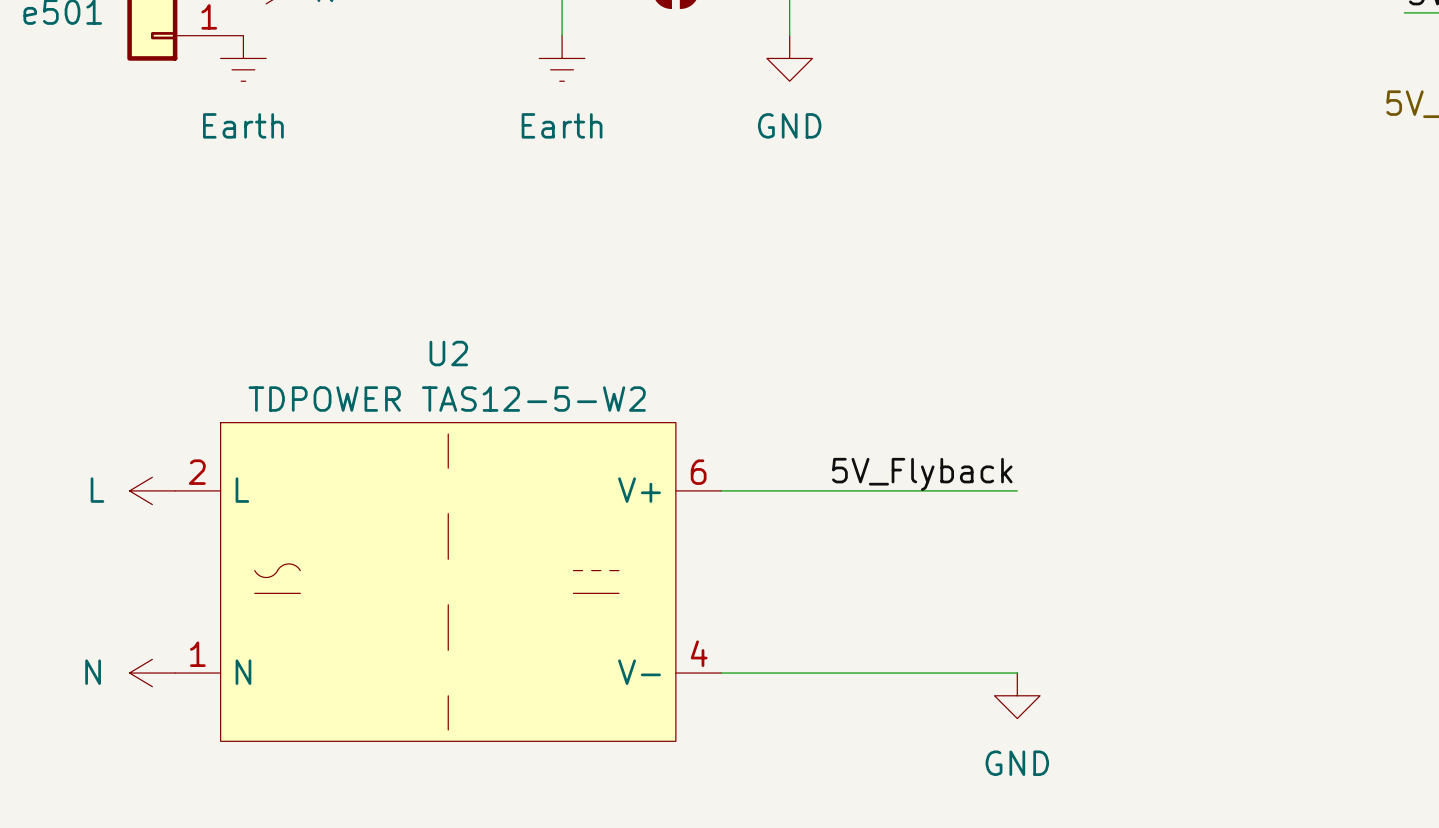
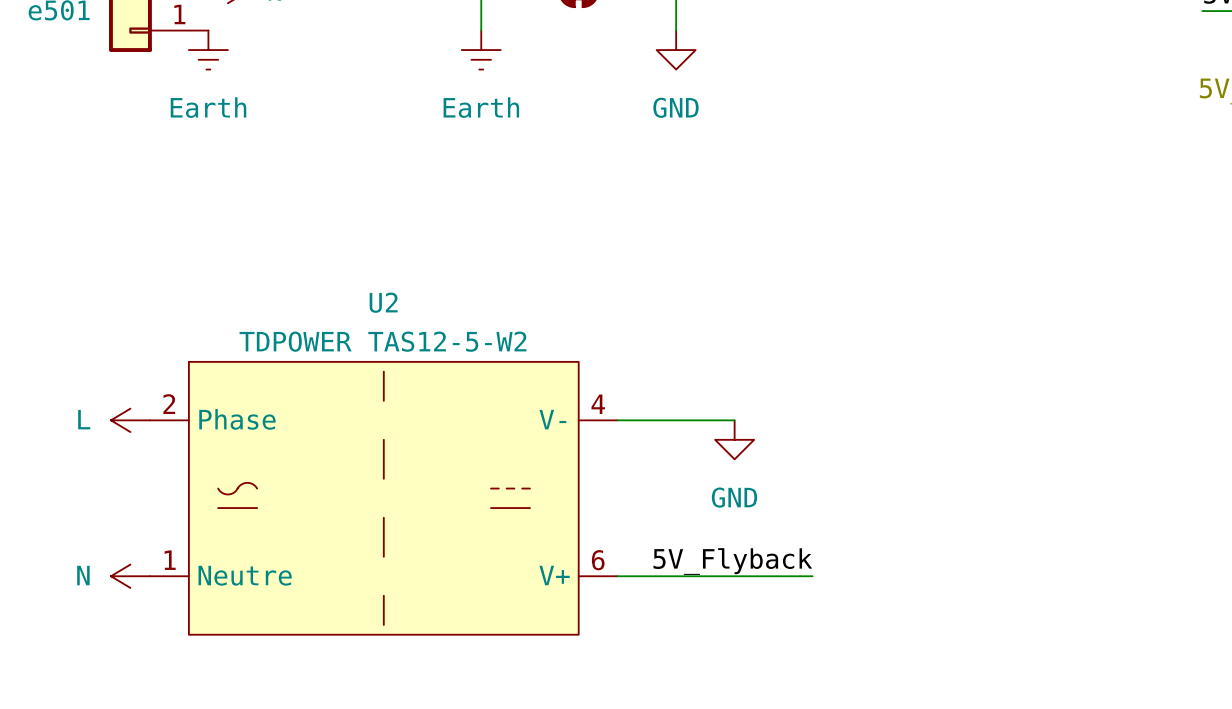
U2 pin number: 6 (698, 472) -> 4 (598, 404)
label position: 5V_Flyback (922, 474) -> 5V_Flyback (732, 561)
U2 pin name: L (242, 490) -> Phase (237, 419)
U2 pin name: V+ (639, 490) -> V- (552, 419)
wire: (857, 490) (1017, 490) -> none
U2 pin number: 4 (699, 653) -> 6 (598, 560)
U2 pin name: N (243, 672) -> Neutre (245, 575)
U2 pin name: V- (639, 672) -> V+ (554, 575)
wire: (949, 673) (1017, 673) -> none
power symbol position: GND (1017, 695) -> GND (734, 439)

